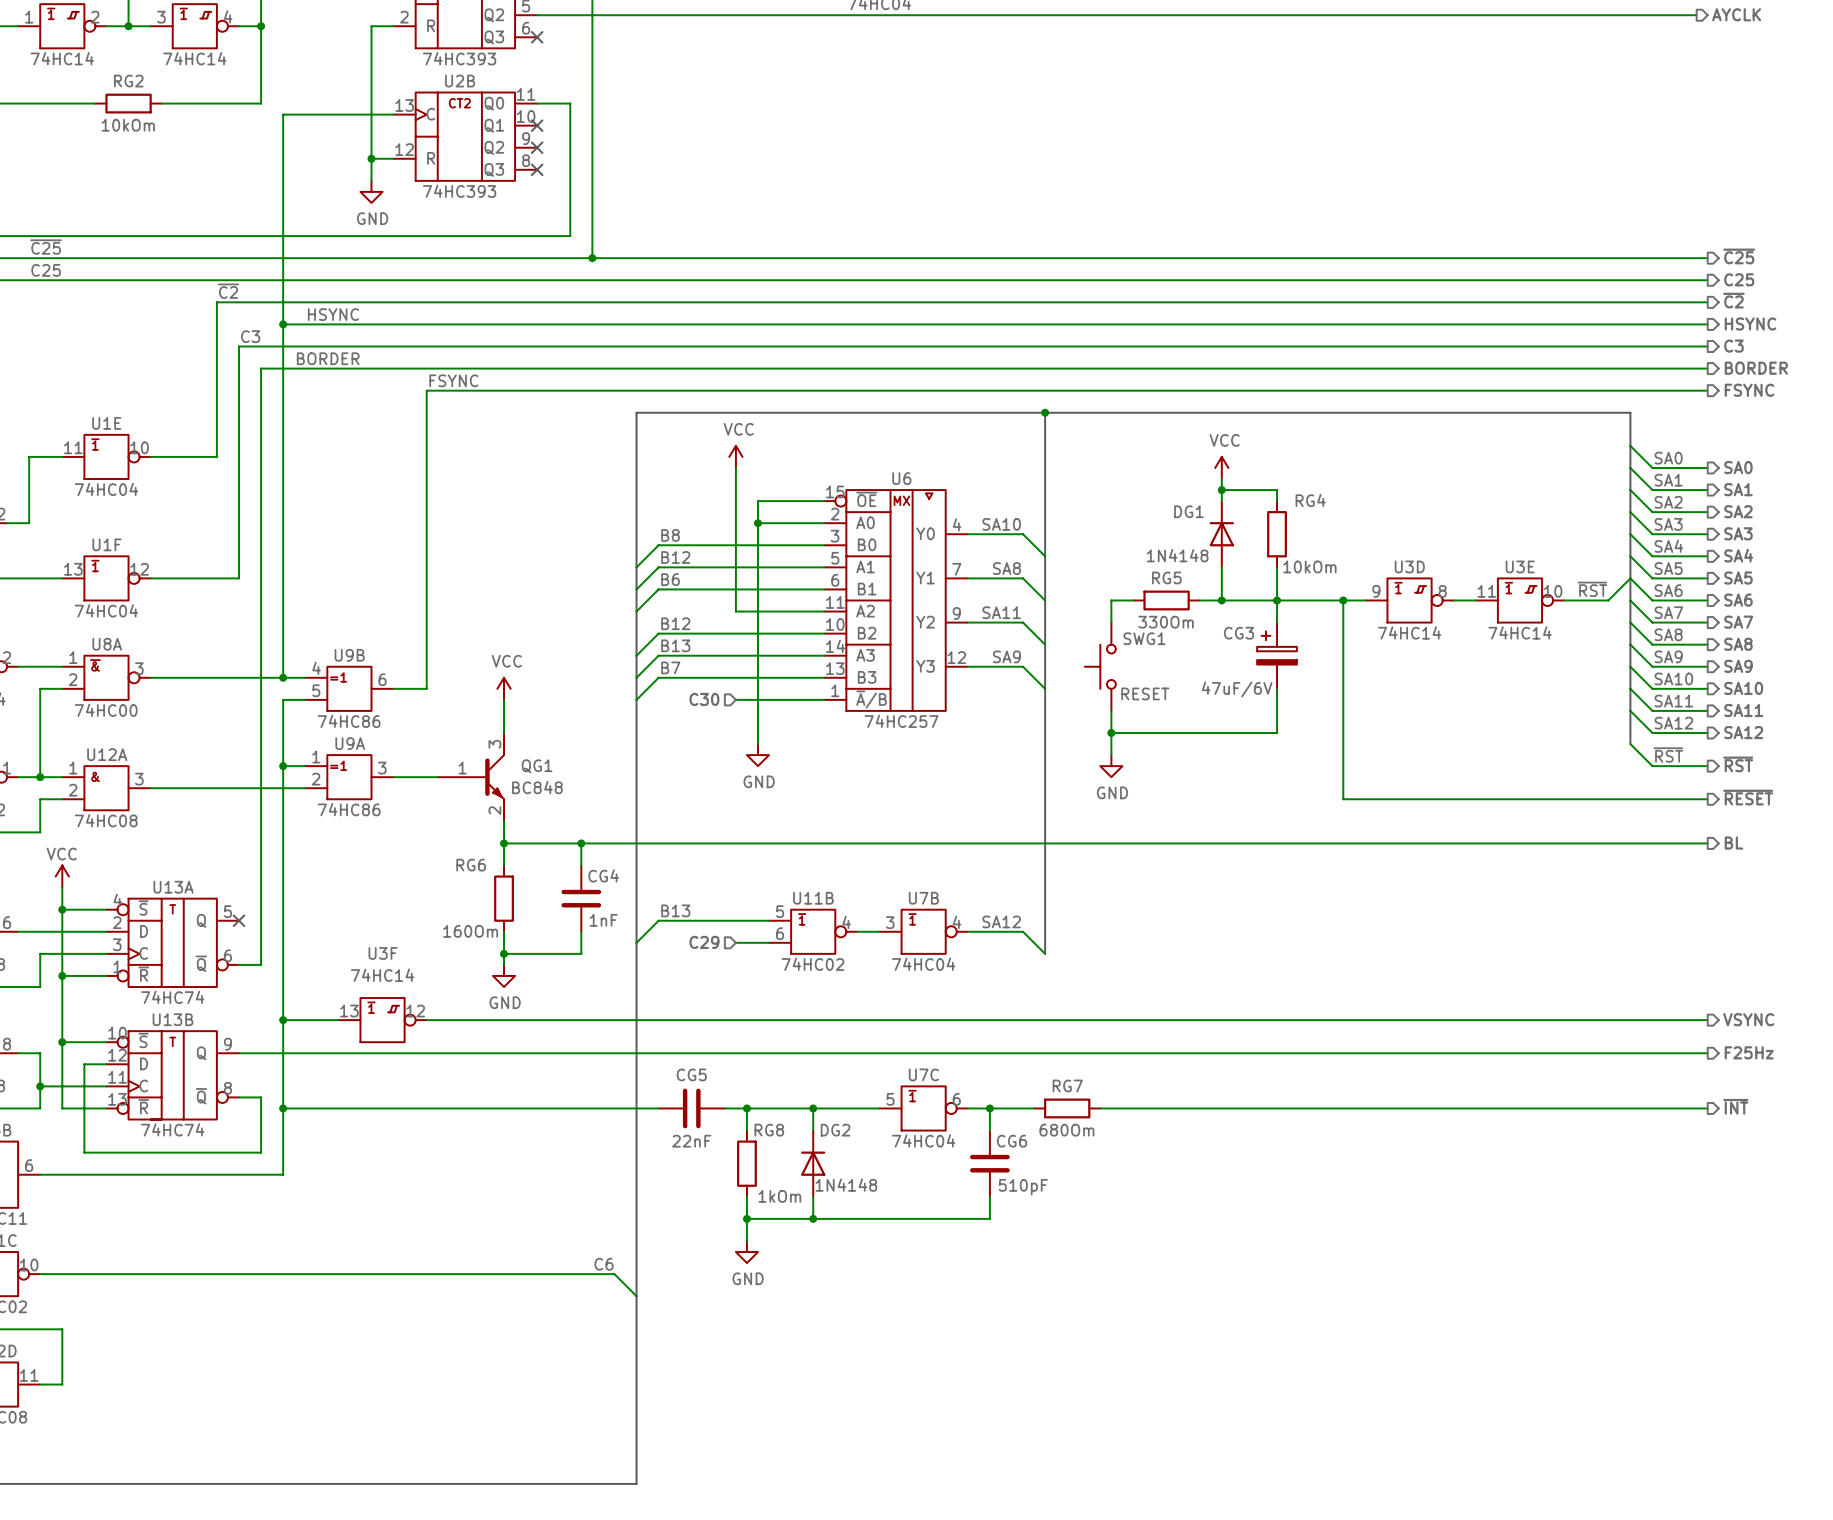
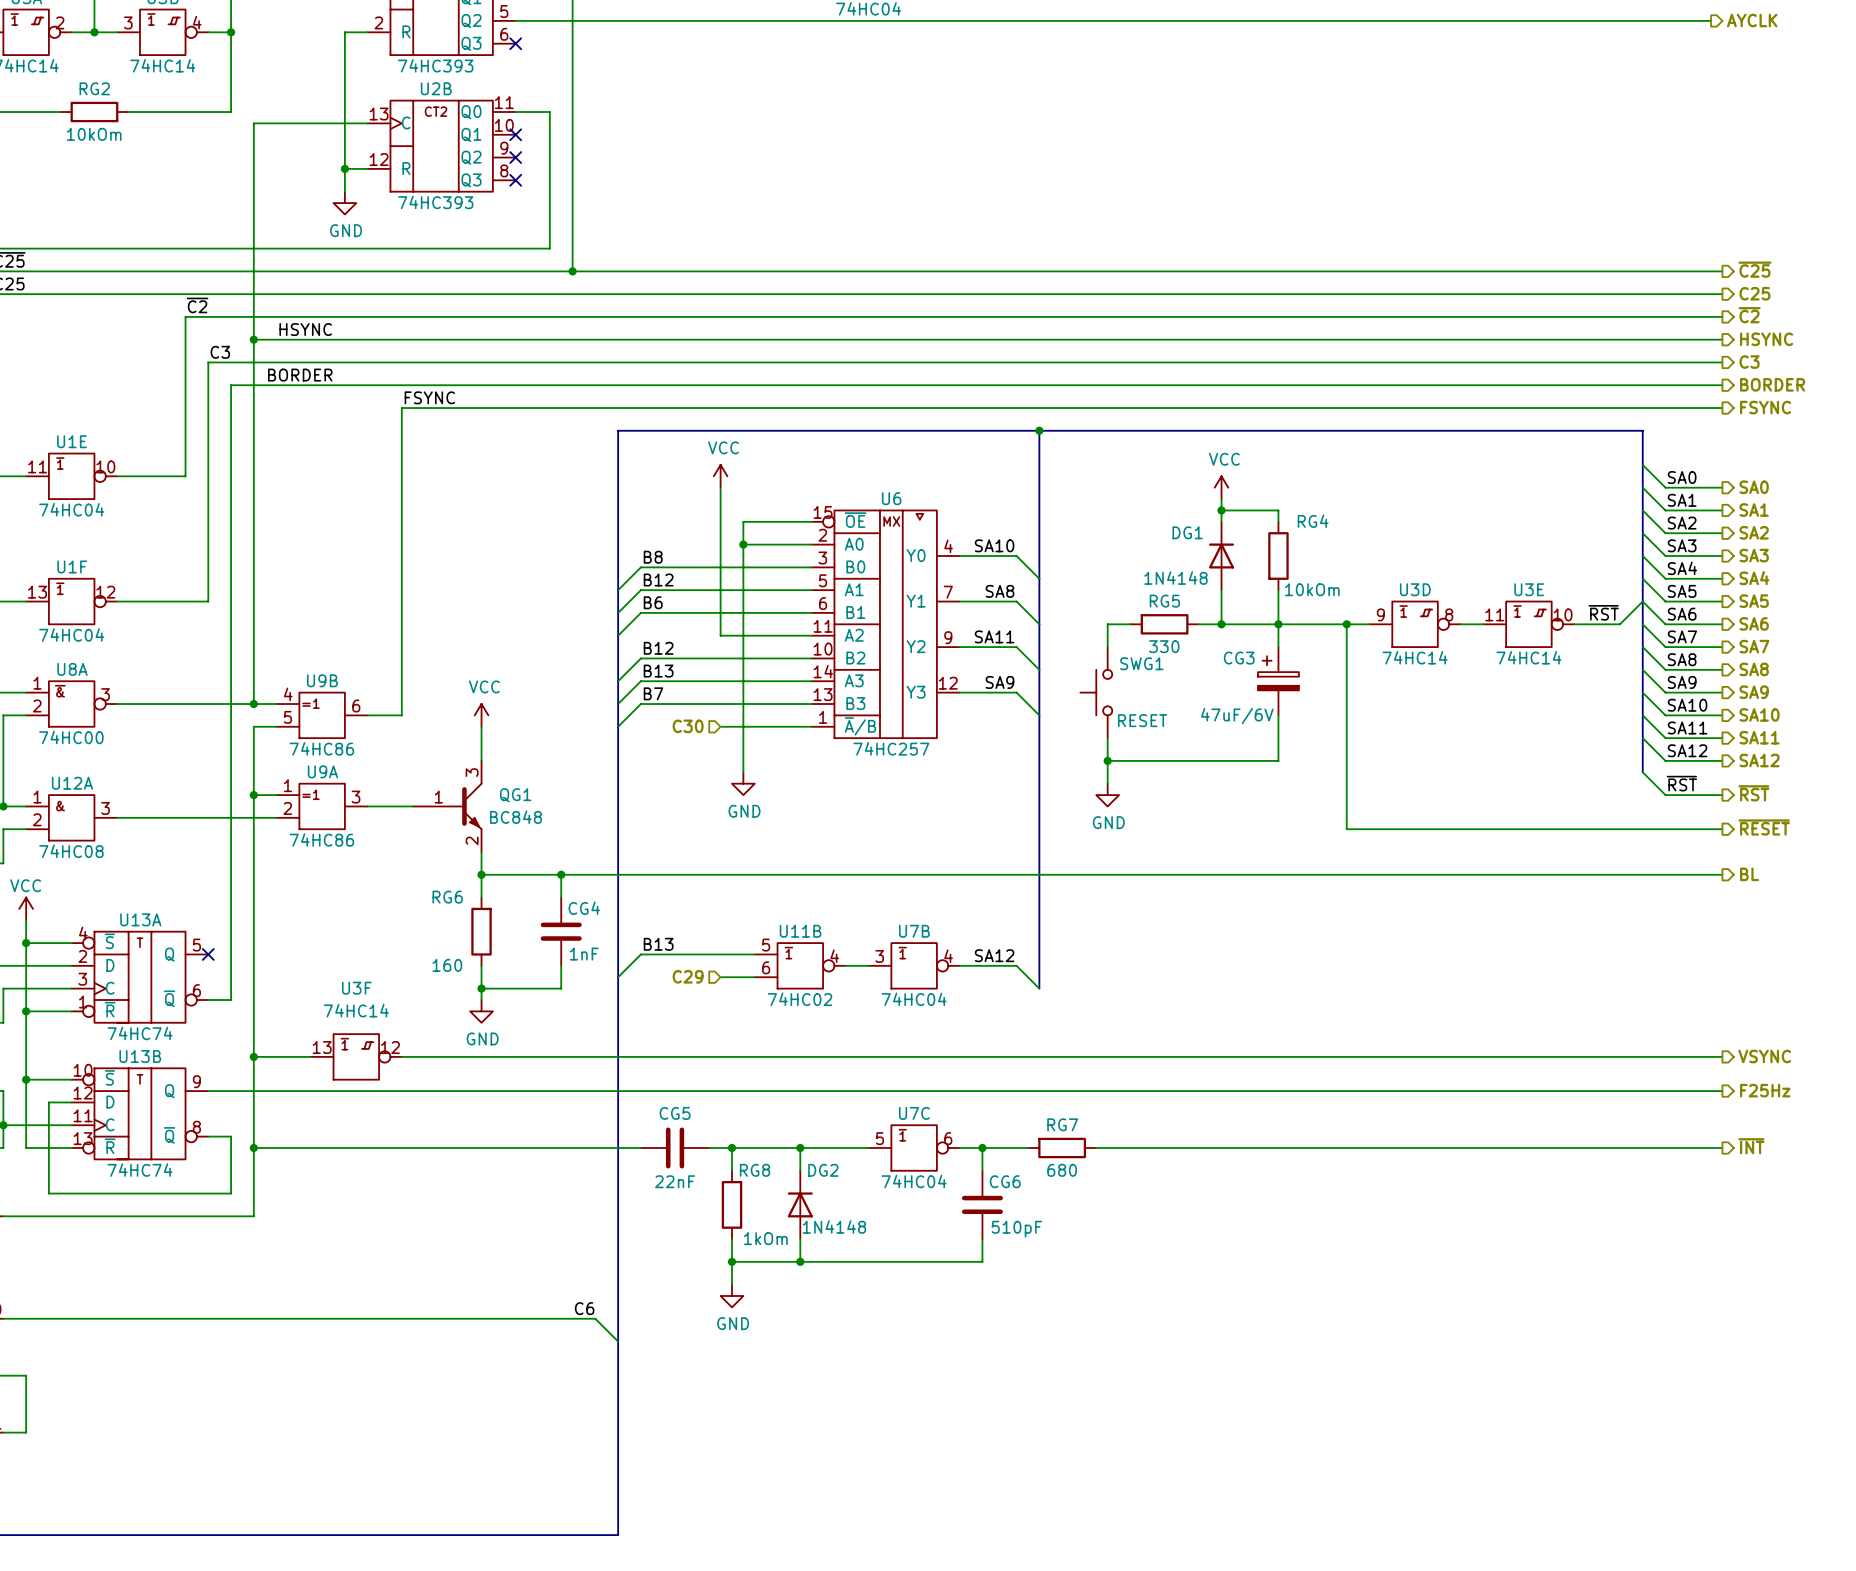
RG5 value: 330Om (1166, 622) -> 330 (1164, 646)
RG6 value: 160Om (470, 931) -> 160 (447, 965)
RG7 value: 680Om (1066, 1130) -> 680 (1062, 1170)

